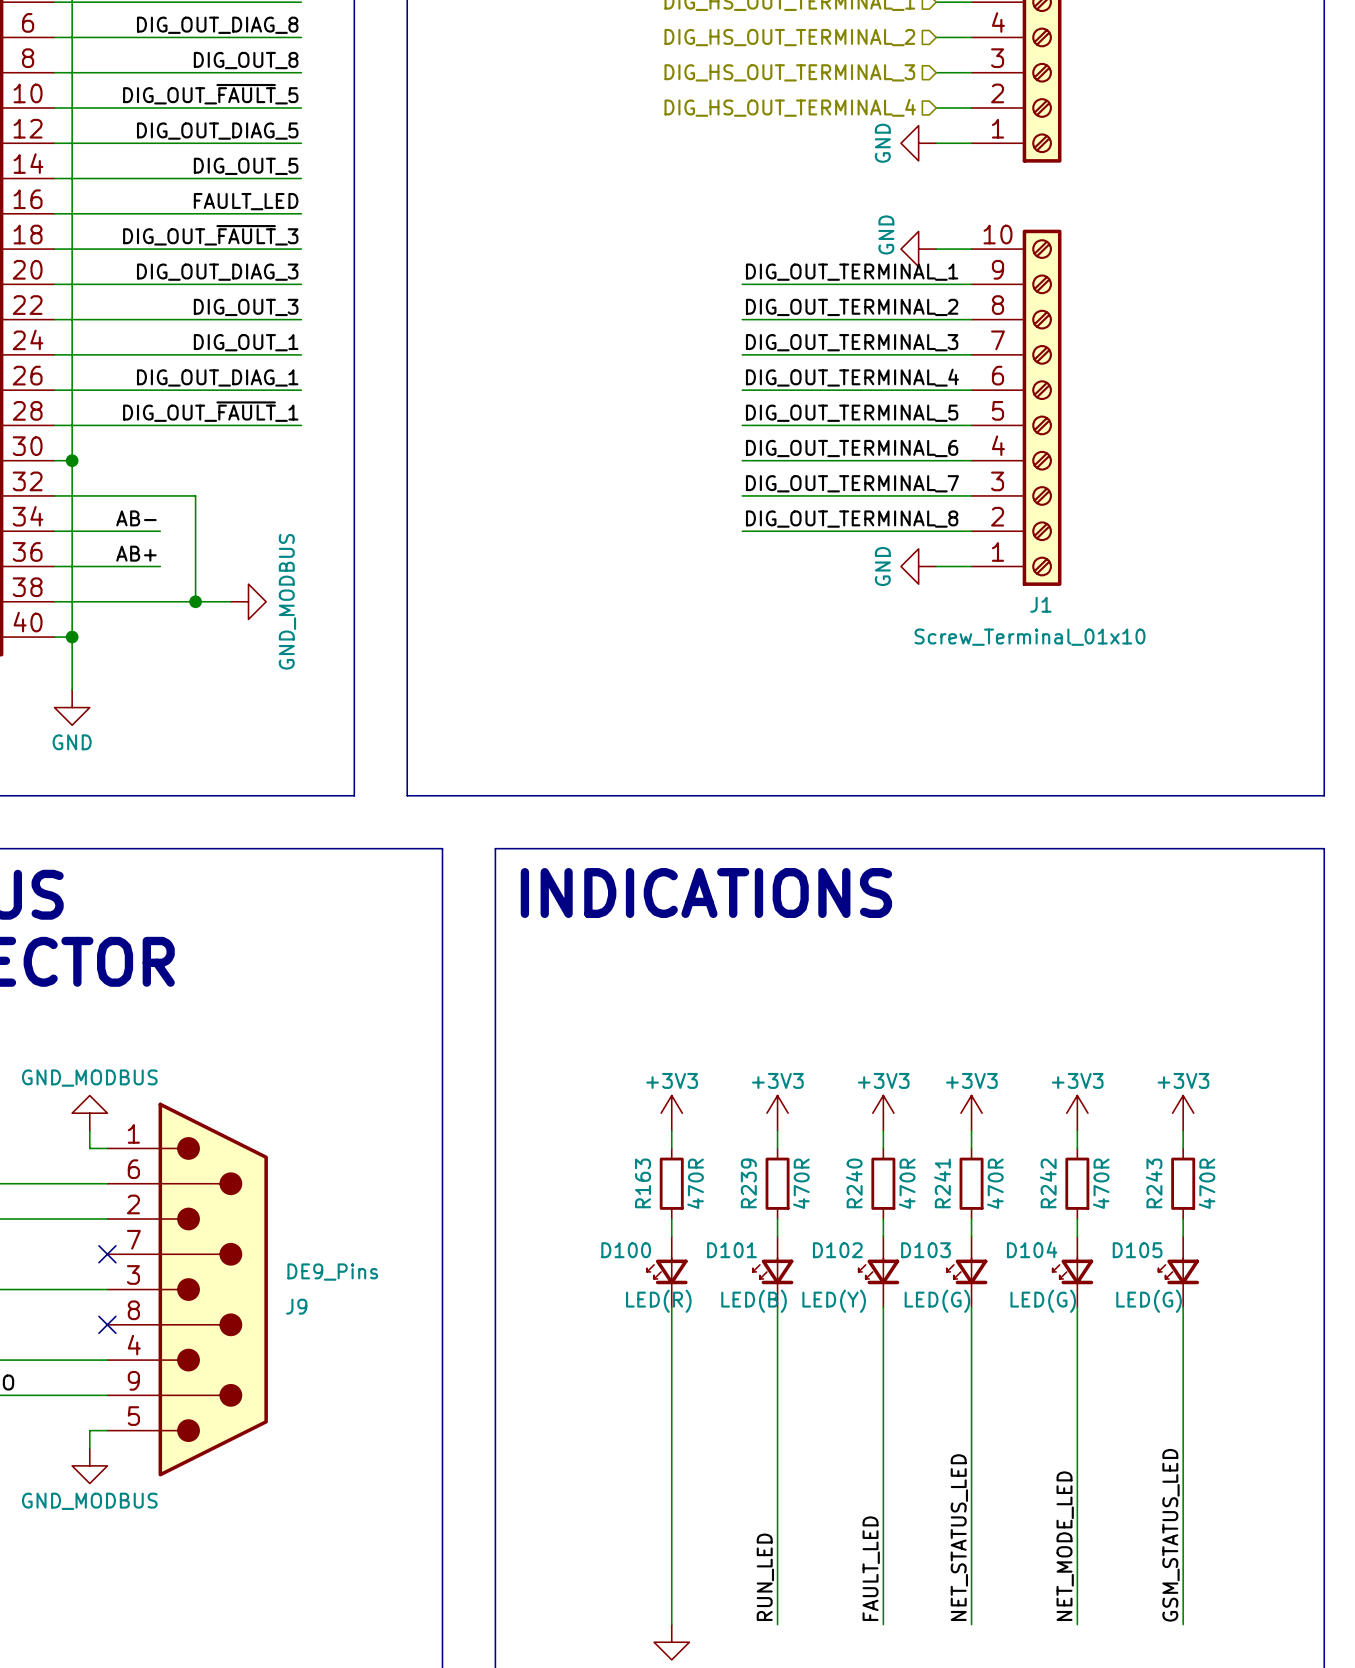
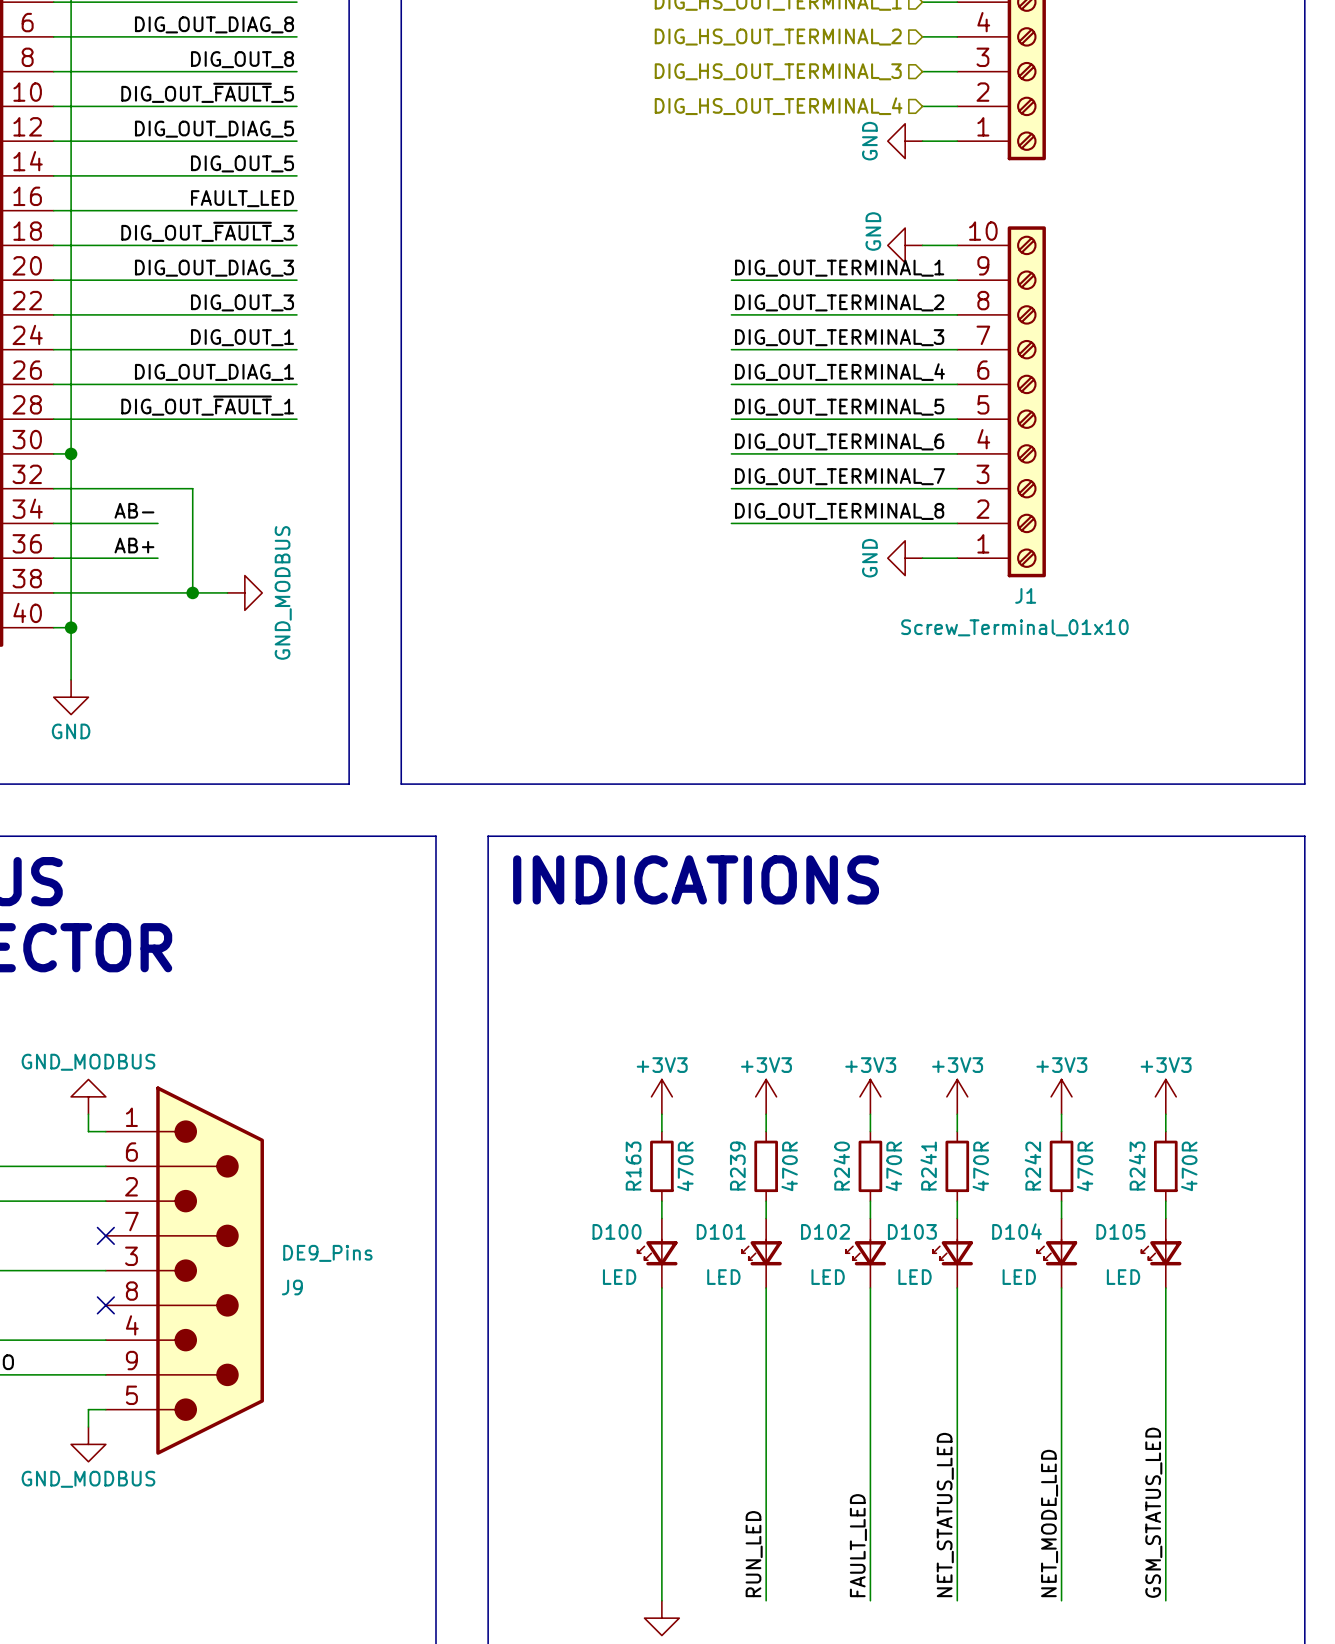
D100 value: LED(R) (658, 1301) -> LED (619, 1277)
D101 value: LED(B) (754, 1301) -> LED (723, 1277)
D102 value: LED(Y) (834, 1301) -> LED (828, 1277)
D103 value: LED(G) (937, 1301) -> LED (915, 1277)
D104 value: LED(G) (1043, 1301) -> LED (1019, 1277)
D105 value: LED(G) (1149, 1301) -> LED (1123, 1277)

